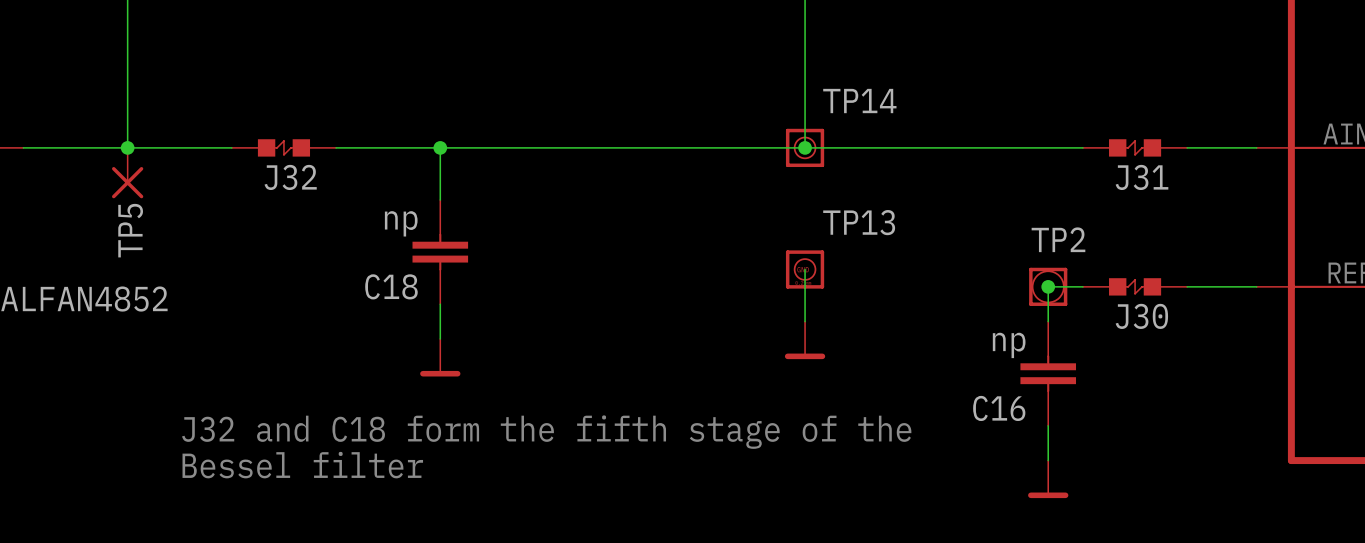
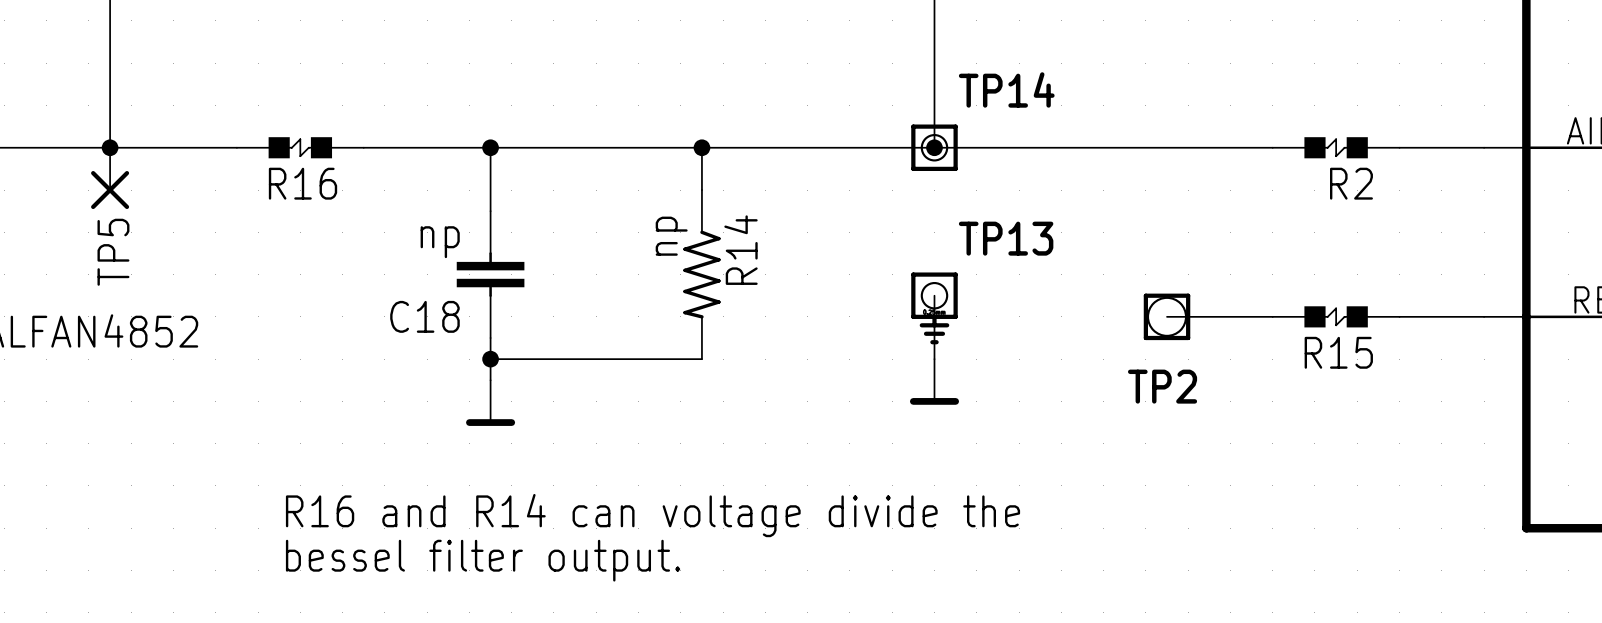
wire: none -> (701, 147) (701, 190)
junction: none -> (701, 147)
J32 name: J32 (290, 177) -> R16 (303, 183)
J31 name: J31 (1142, 177) -> R2 (1351, 183)
TP2 name position: TP2 (1058, 239) -> TP2 (1162, 386)
TP13 symbol: [785, 250, 825, 289] -> [911, 272, 958, 345]
R14: none -> np (701, 274)
wire: (1048, 286) (1048, 321) -> (1230, 316) (1167, 316)
TP2 position: (1048, 286) -> (1167, 316)
junction: (1048, 286) -> none
J30 name: J30 (1141, 316) -> R15 (1338, 352)
wire: none -> (490, 359) (701, 359)
junction: none -> (490, 359)
C16: np (1048, 373) -> none
wire: (1048, 425) (1048, 460) -> none
text: J32 and C18 form the fifth stage of the (546, 432) -> none
text: none -> R16 and R14 can voltage divide the (653, 515)
text: Bessel filter (302, 465) -> bessel filter output. (483, 560)
power symbol: (1048, 479) -> none

